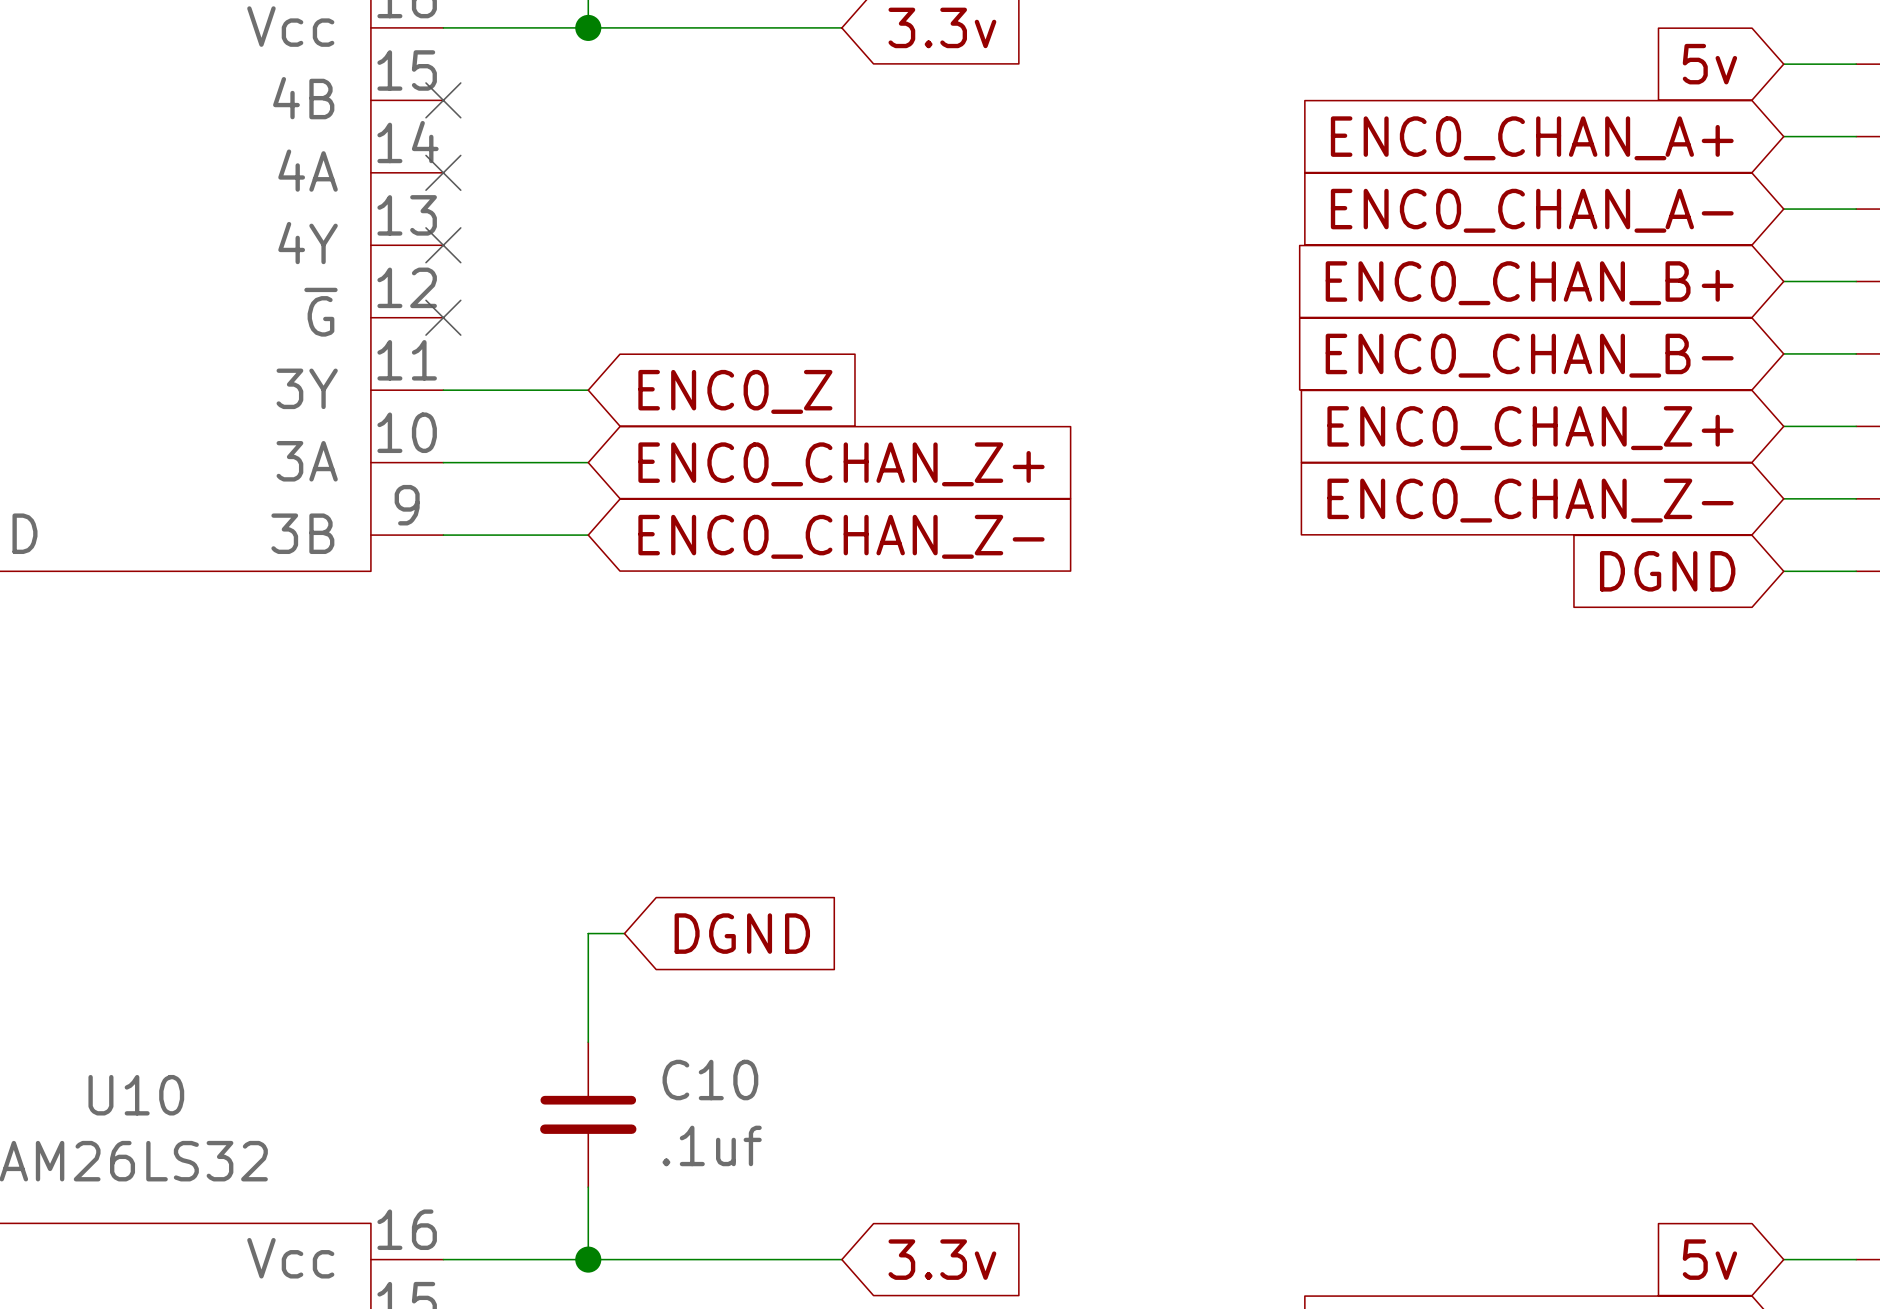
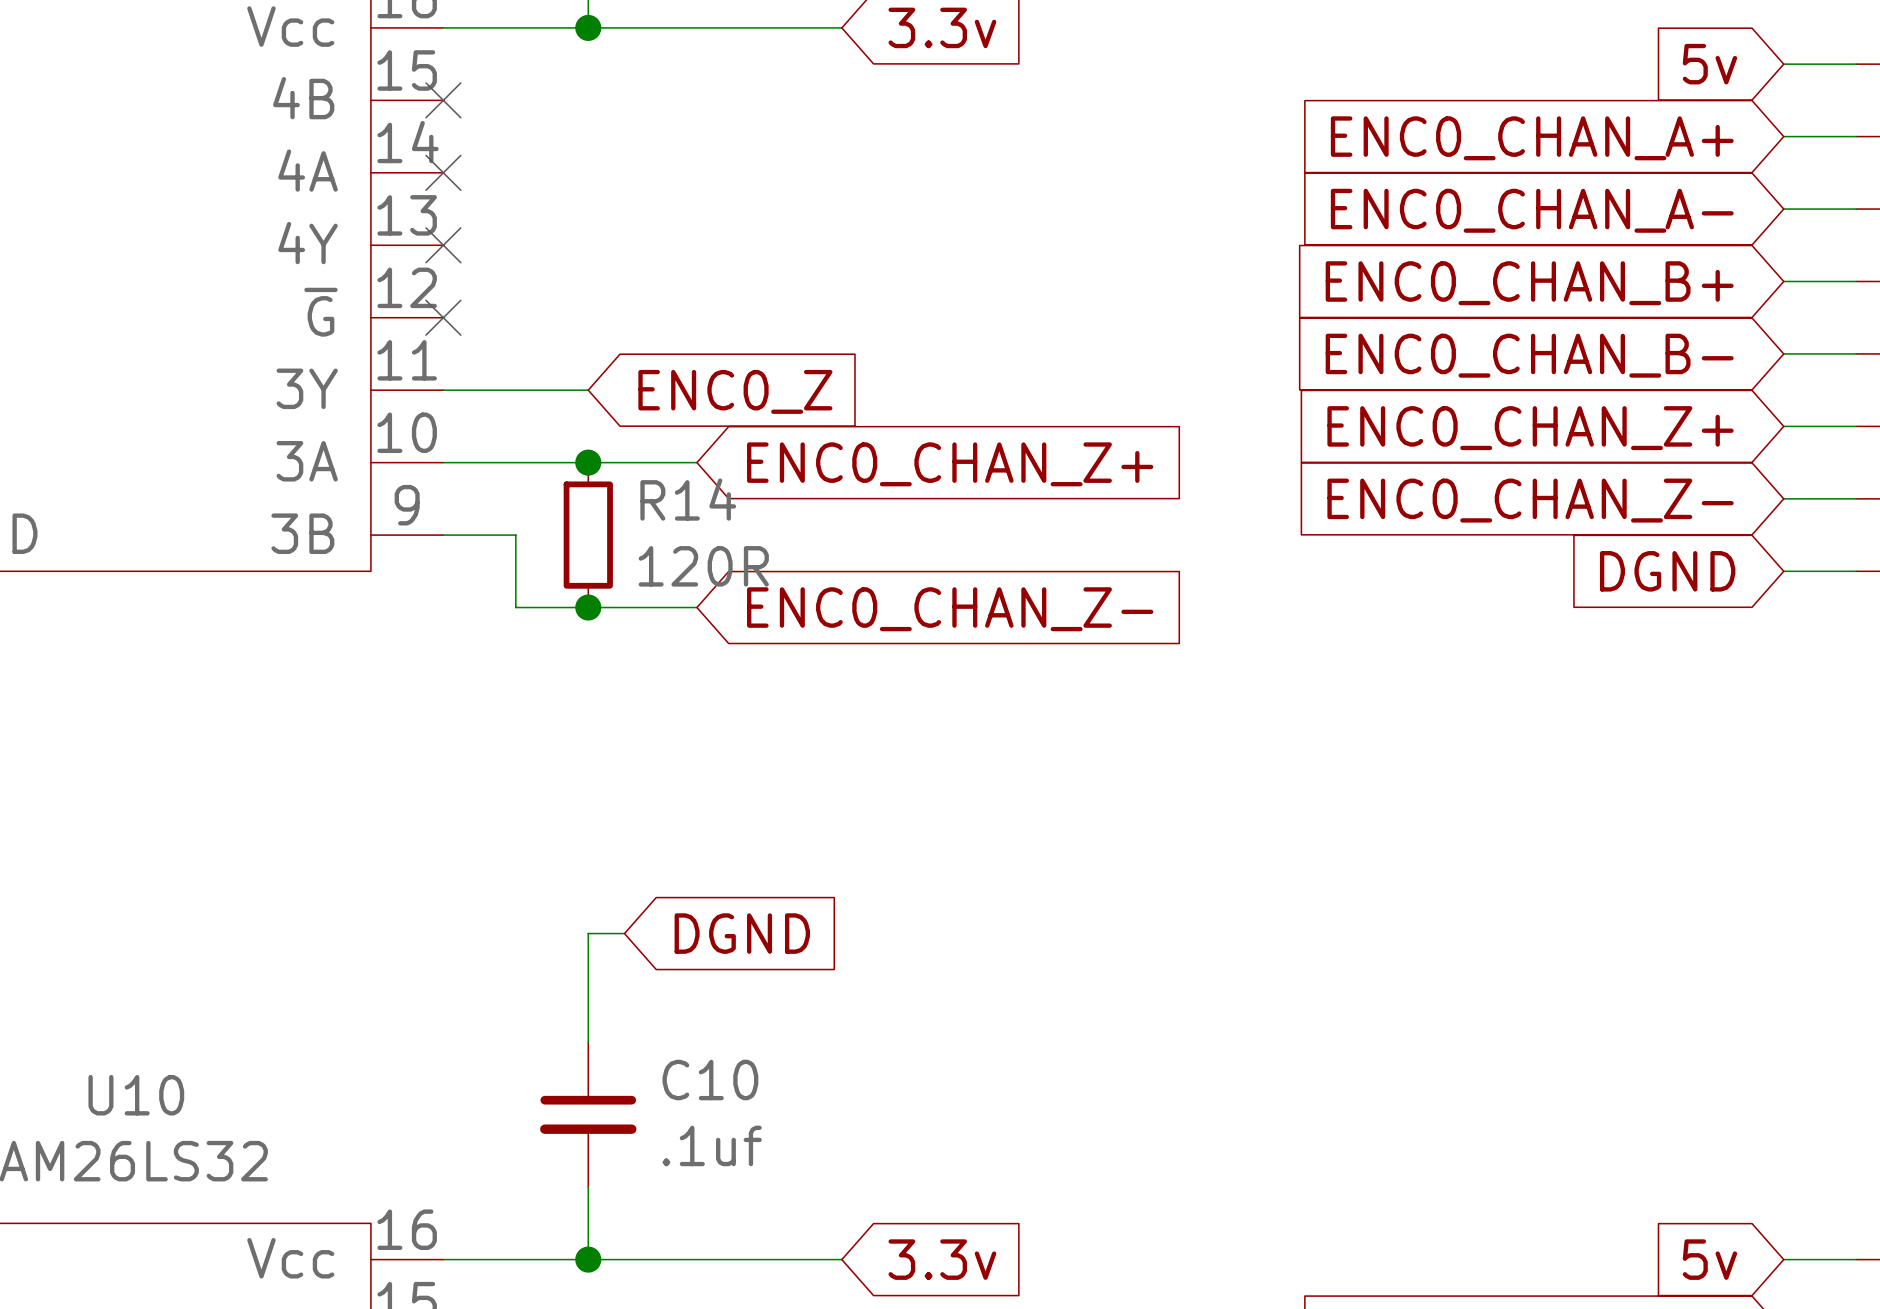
wire: none -> (588, 462) (696, 462)
junction: none -> (588, 462)
global label position: ENC0_CHAN_Z+ (841, 464) -> ENC0_CHAN_Z+ (950, 464)
wire: (515, 535) (588, 535) -> (515, 535) (515, 607) (696, 607)
R14: none -> 120R (588, 535)
global label position: ENC0_CHAN_Z- (841, 536) -> ENC0_CHAN_Z- (950, 609)
junction: none -> (588, 607)

